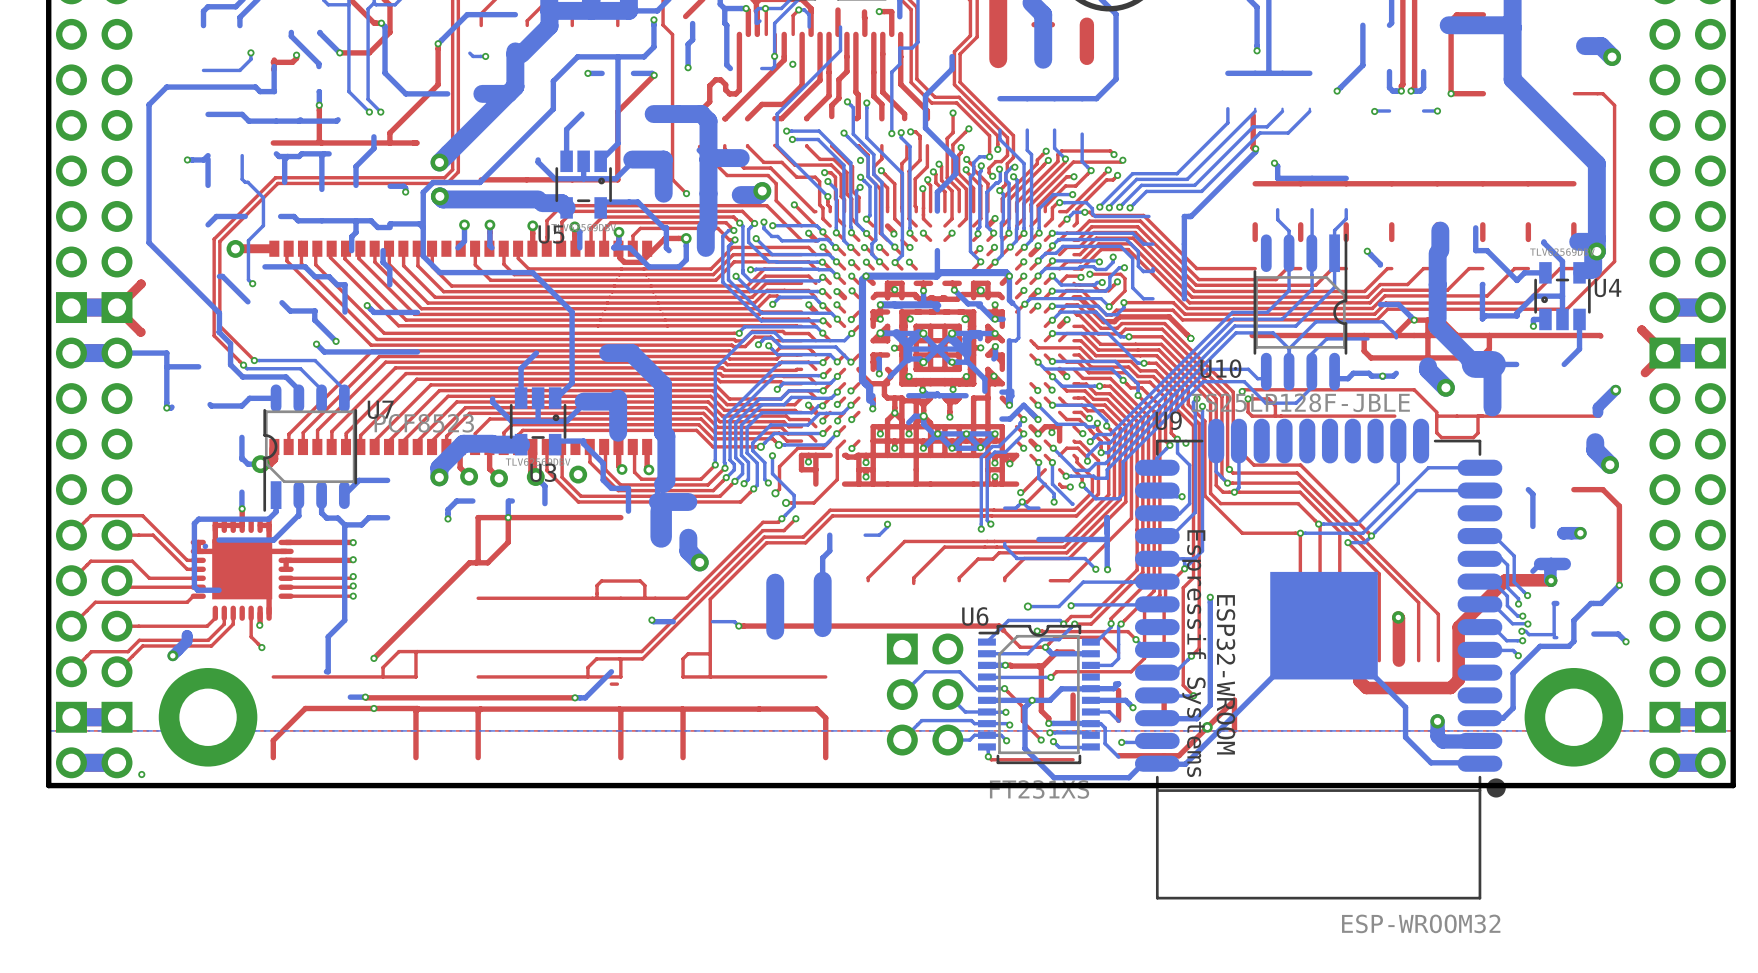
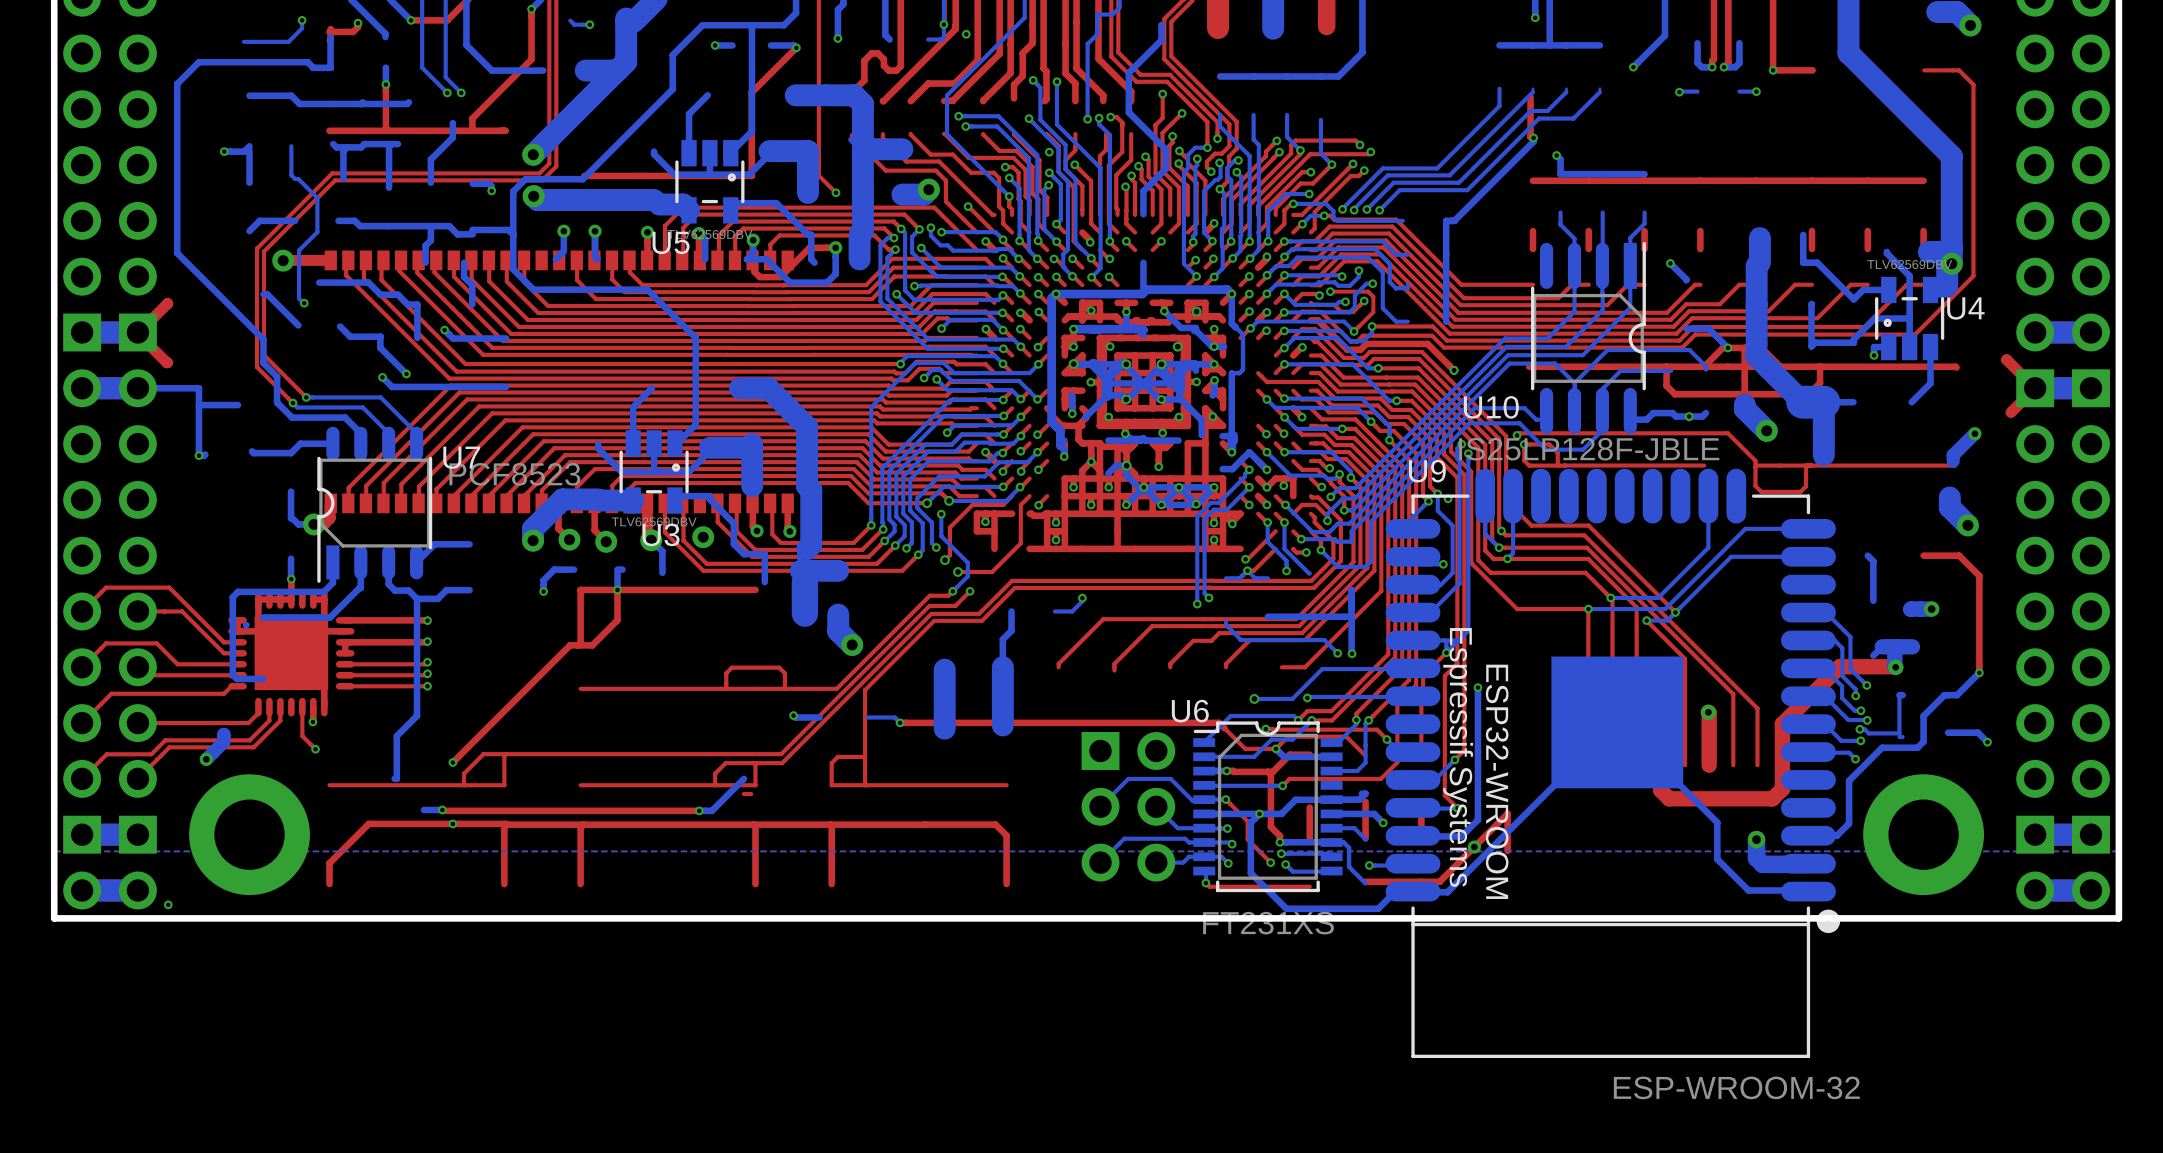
U9 value: ESP-WROOM32 (1421, 923) -> ESP-WROOM-32 (1736, 1087)

